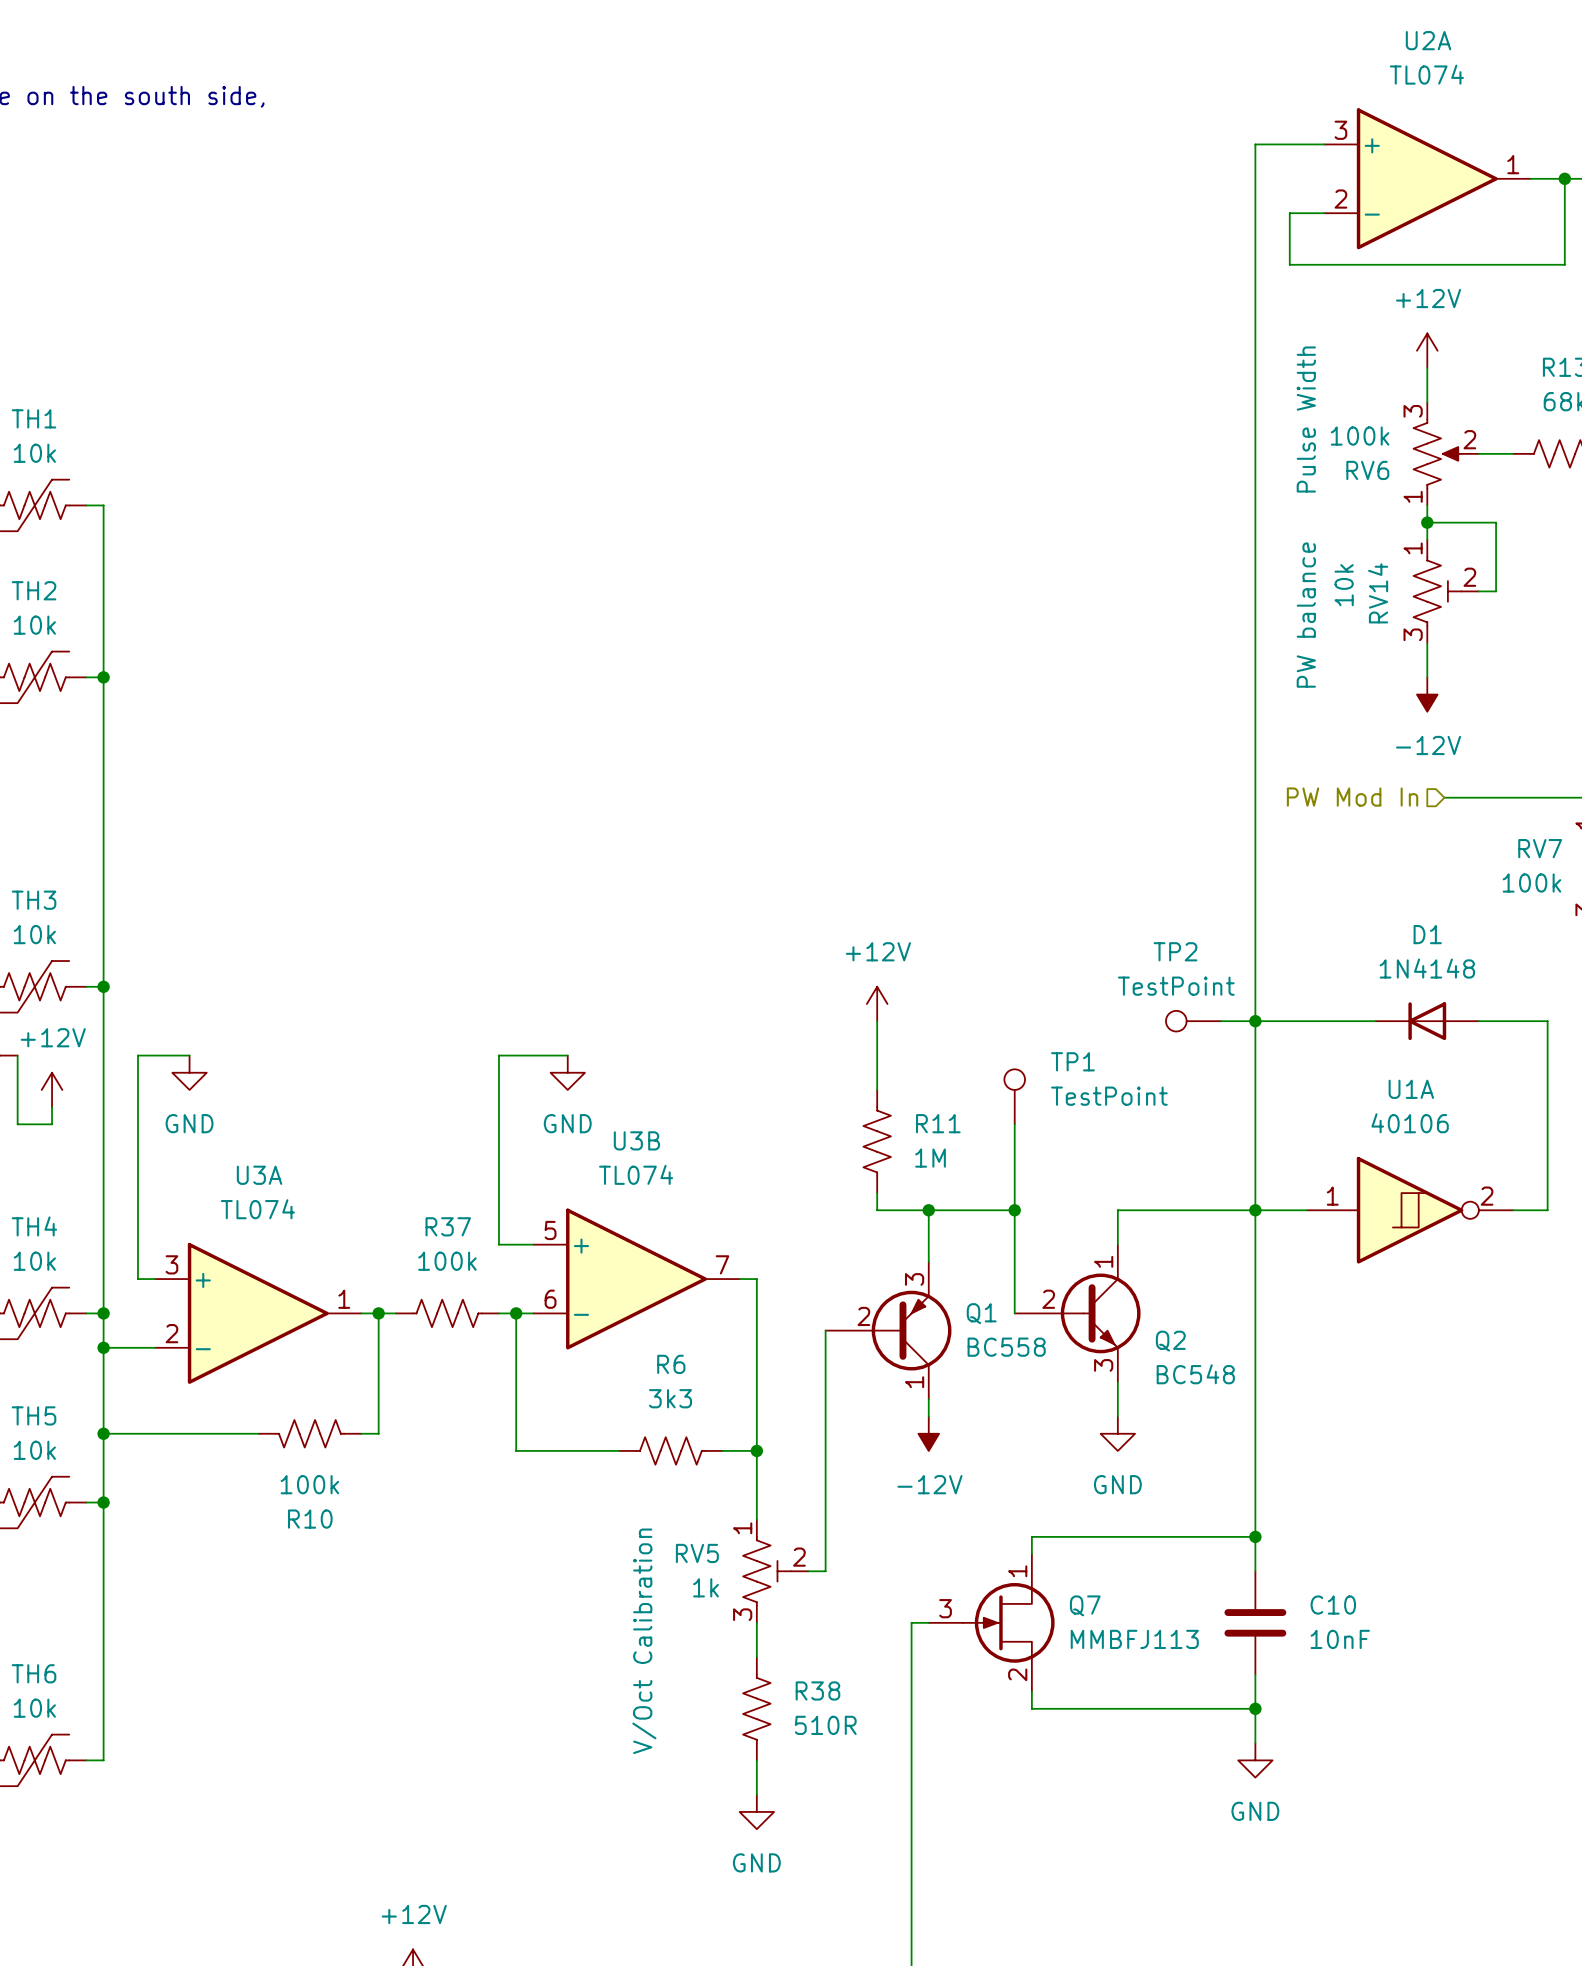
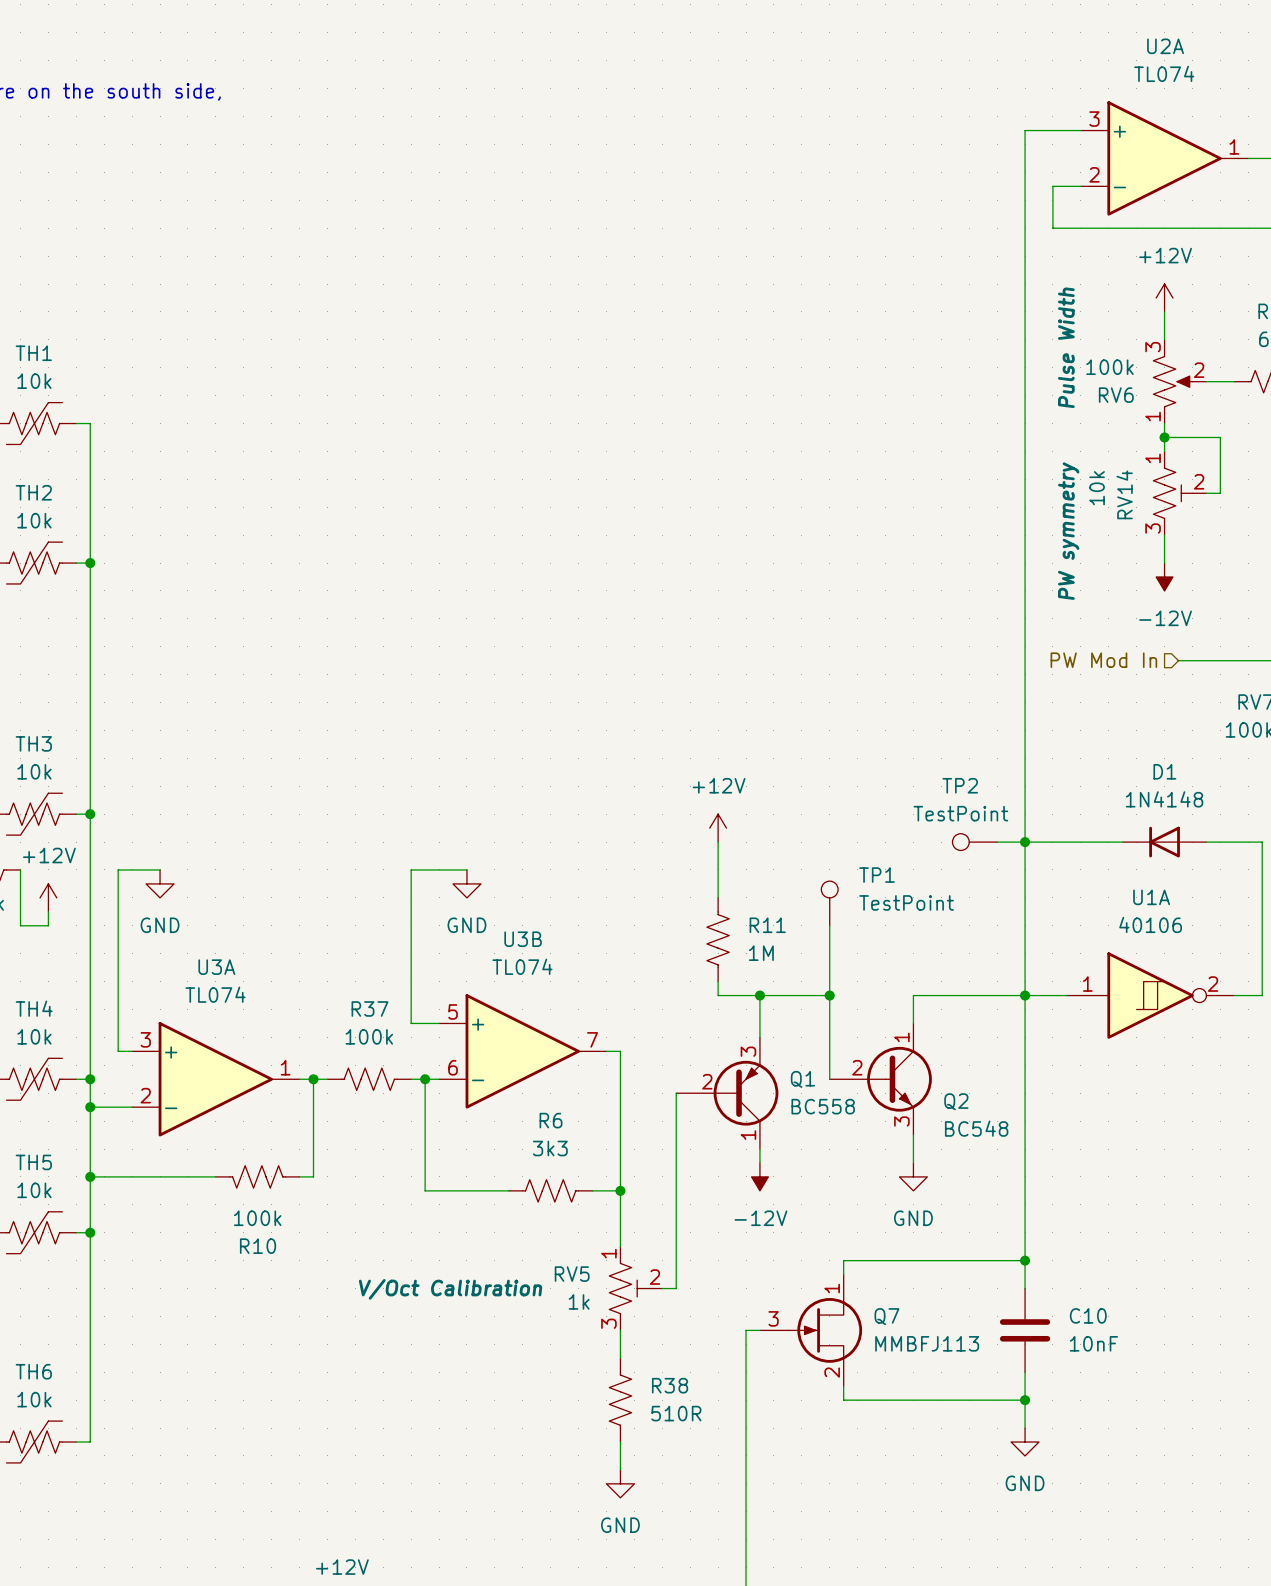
RV6 text: none -> Pulse Width (1066, 347)
RV6 text: Pulse Width (1306, 419) -> none
RV14 text: PW balance (1306, 615) -> PW symmetry (1068, 531)
RV5 text: none -> V/Oct Calibration (450, 1289)
RV5 text: V/Oct Calibration (644, 1641) -> none

